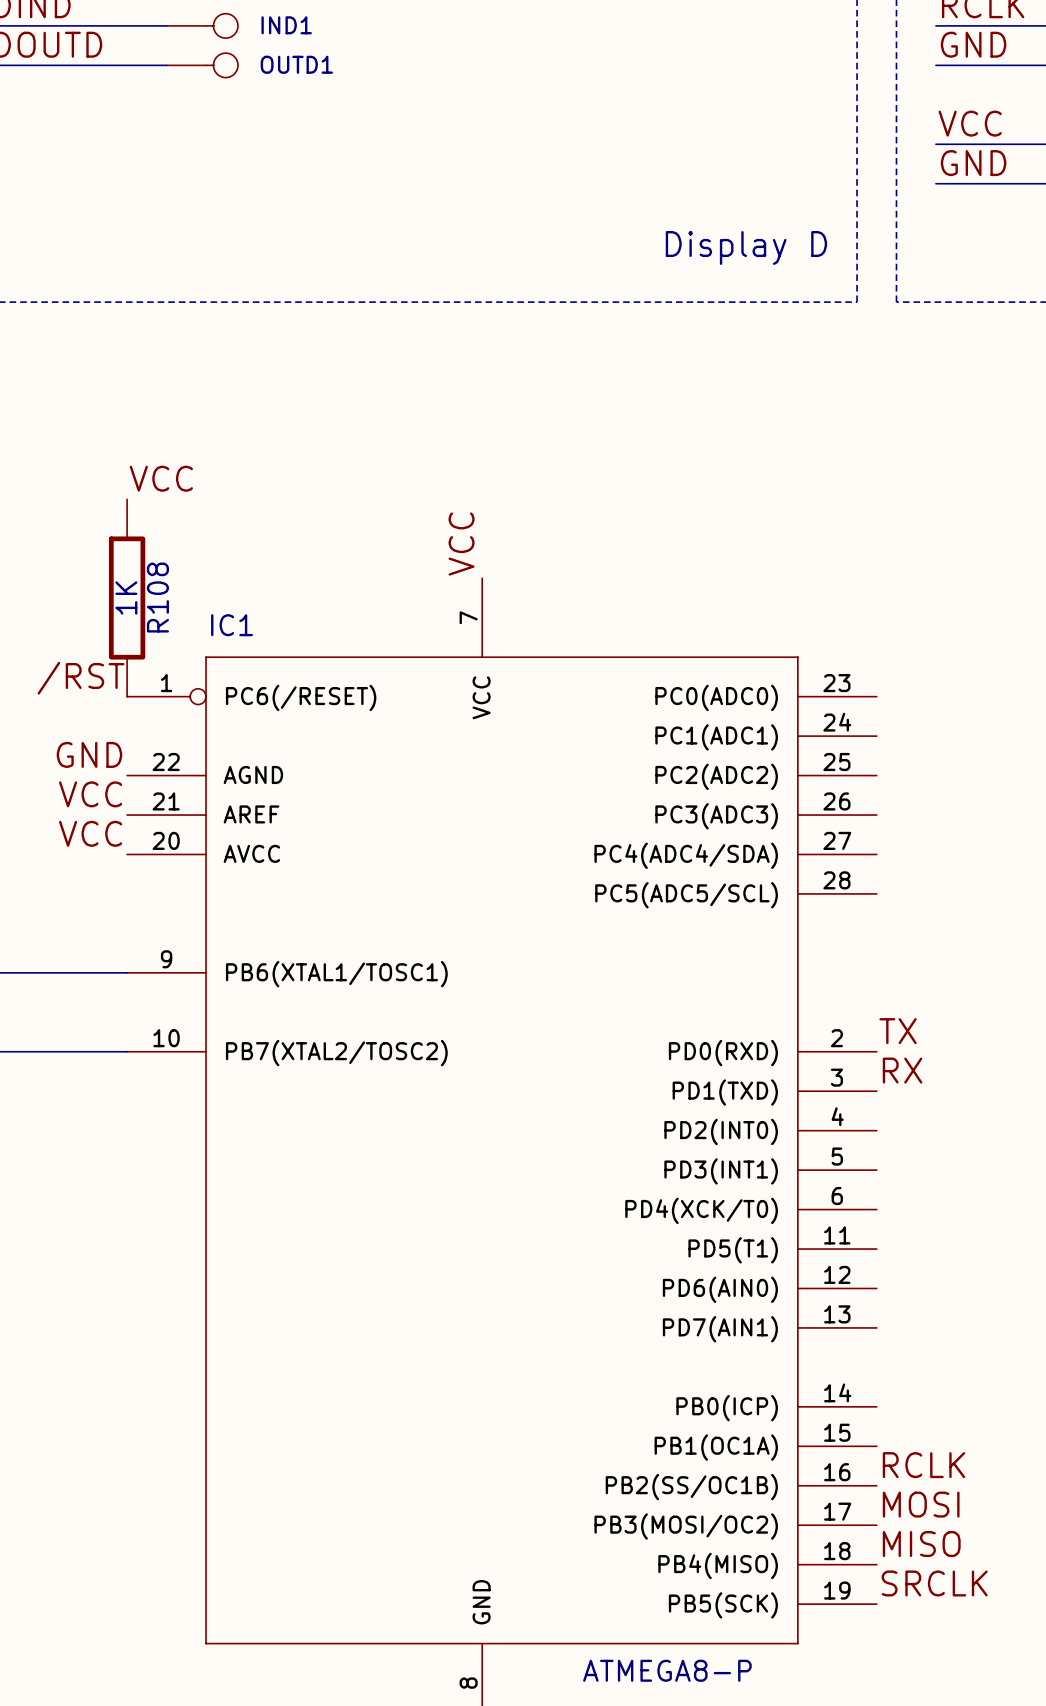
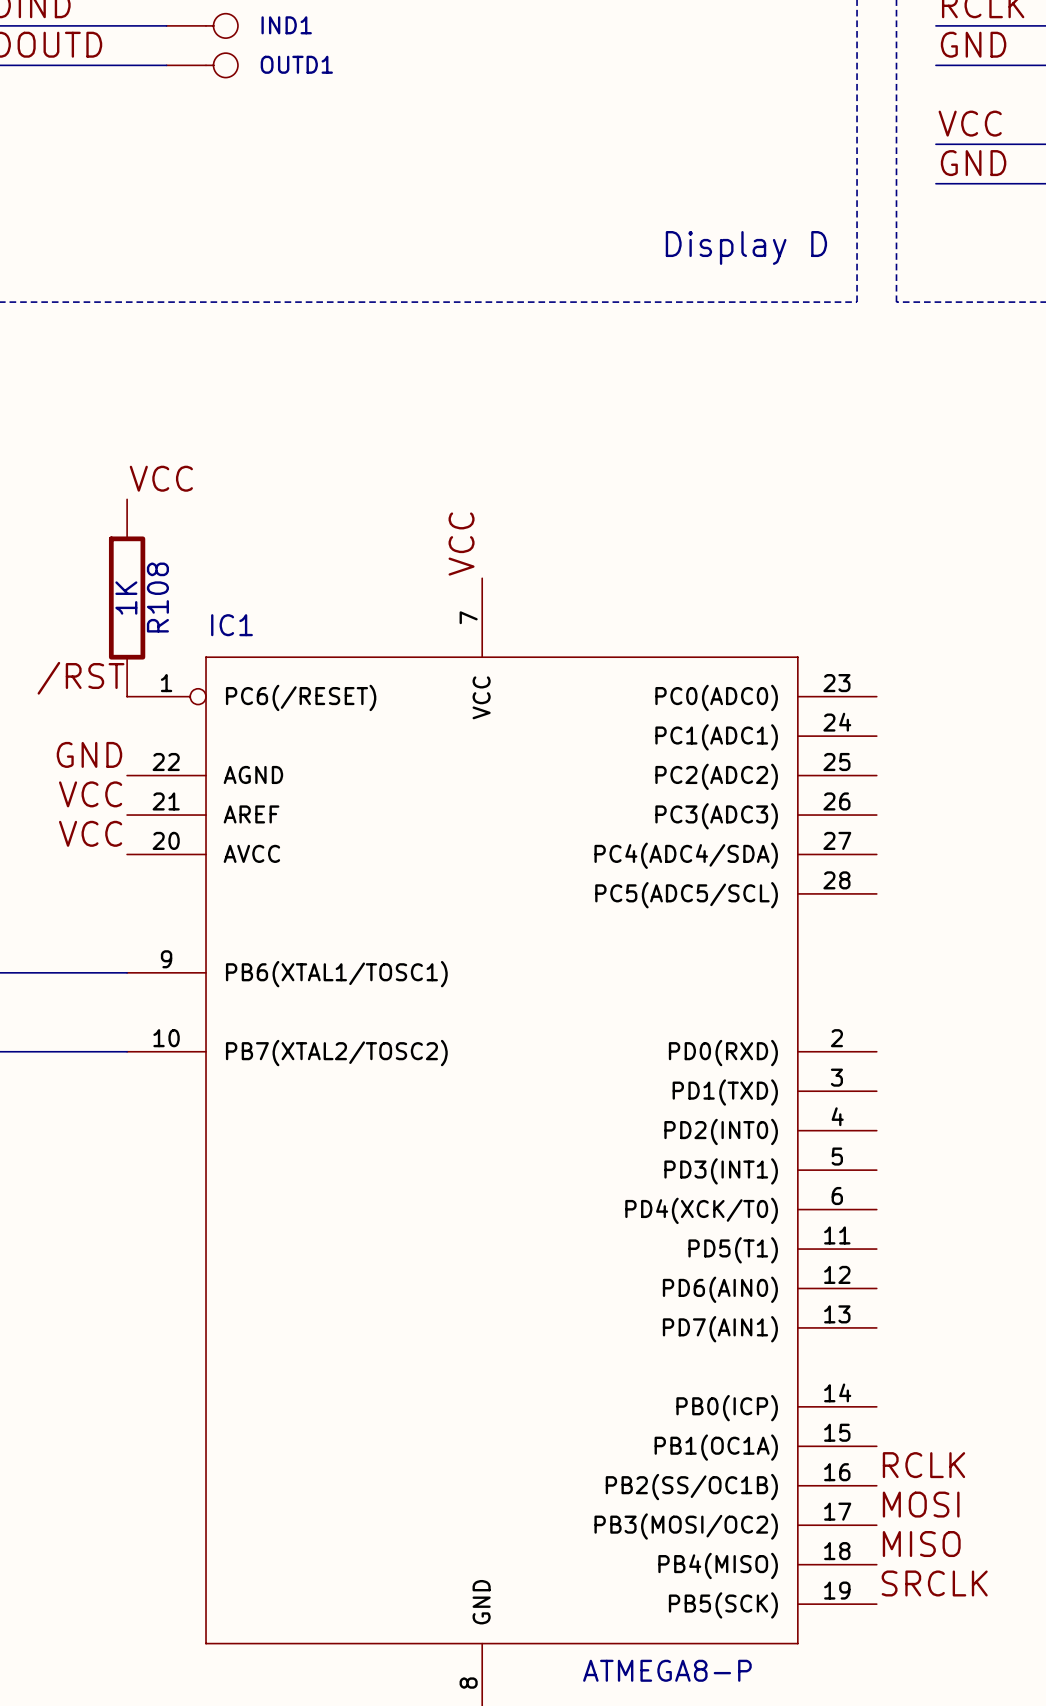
label: TX (898, 1031) -> none
label: RX (902, 1070) -> none

